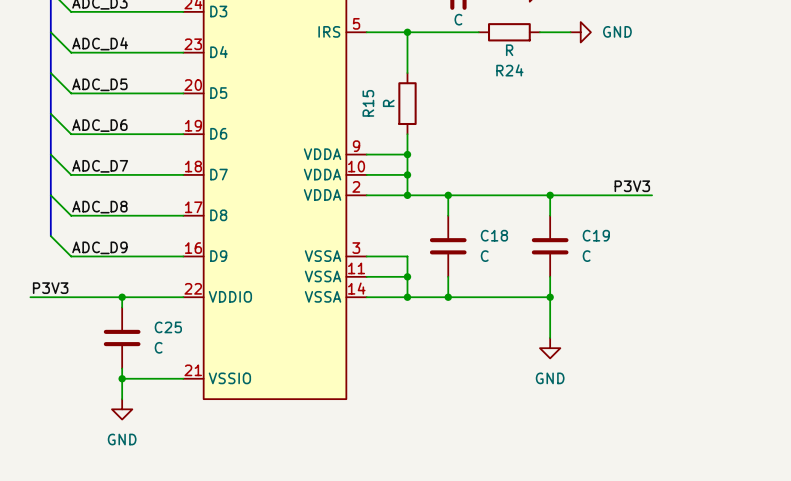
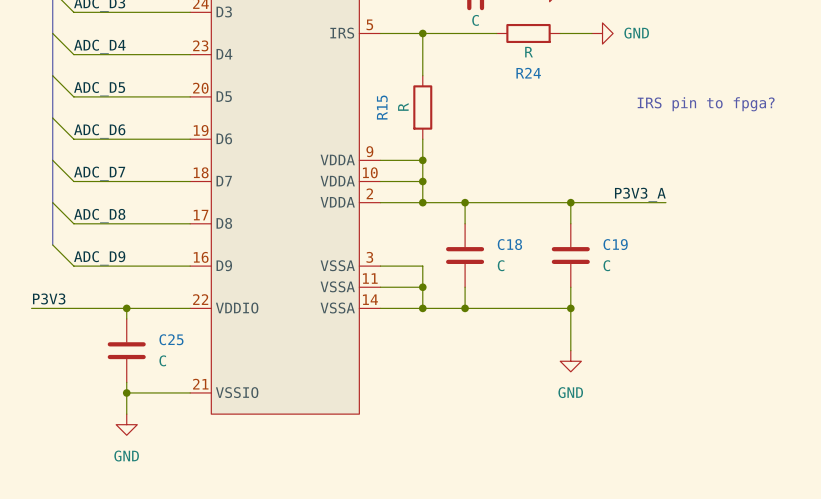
text: none -> IRS pin to fpga? (706, 104)
label: P3V3 (632, 186) -> P3V3_A (640, 194)
wire: (641, 195) (652, 195) -> none

